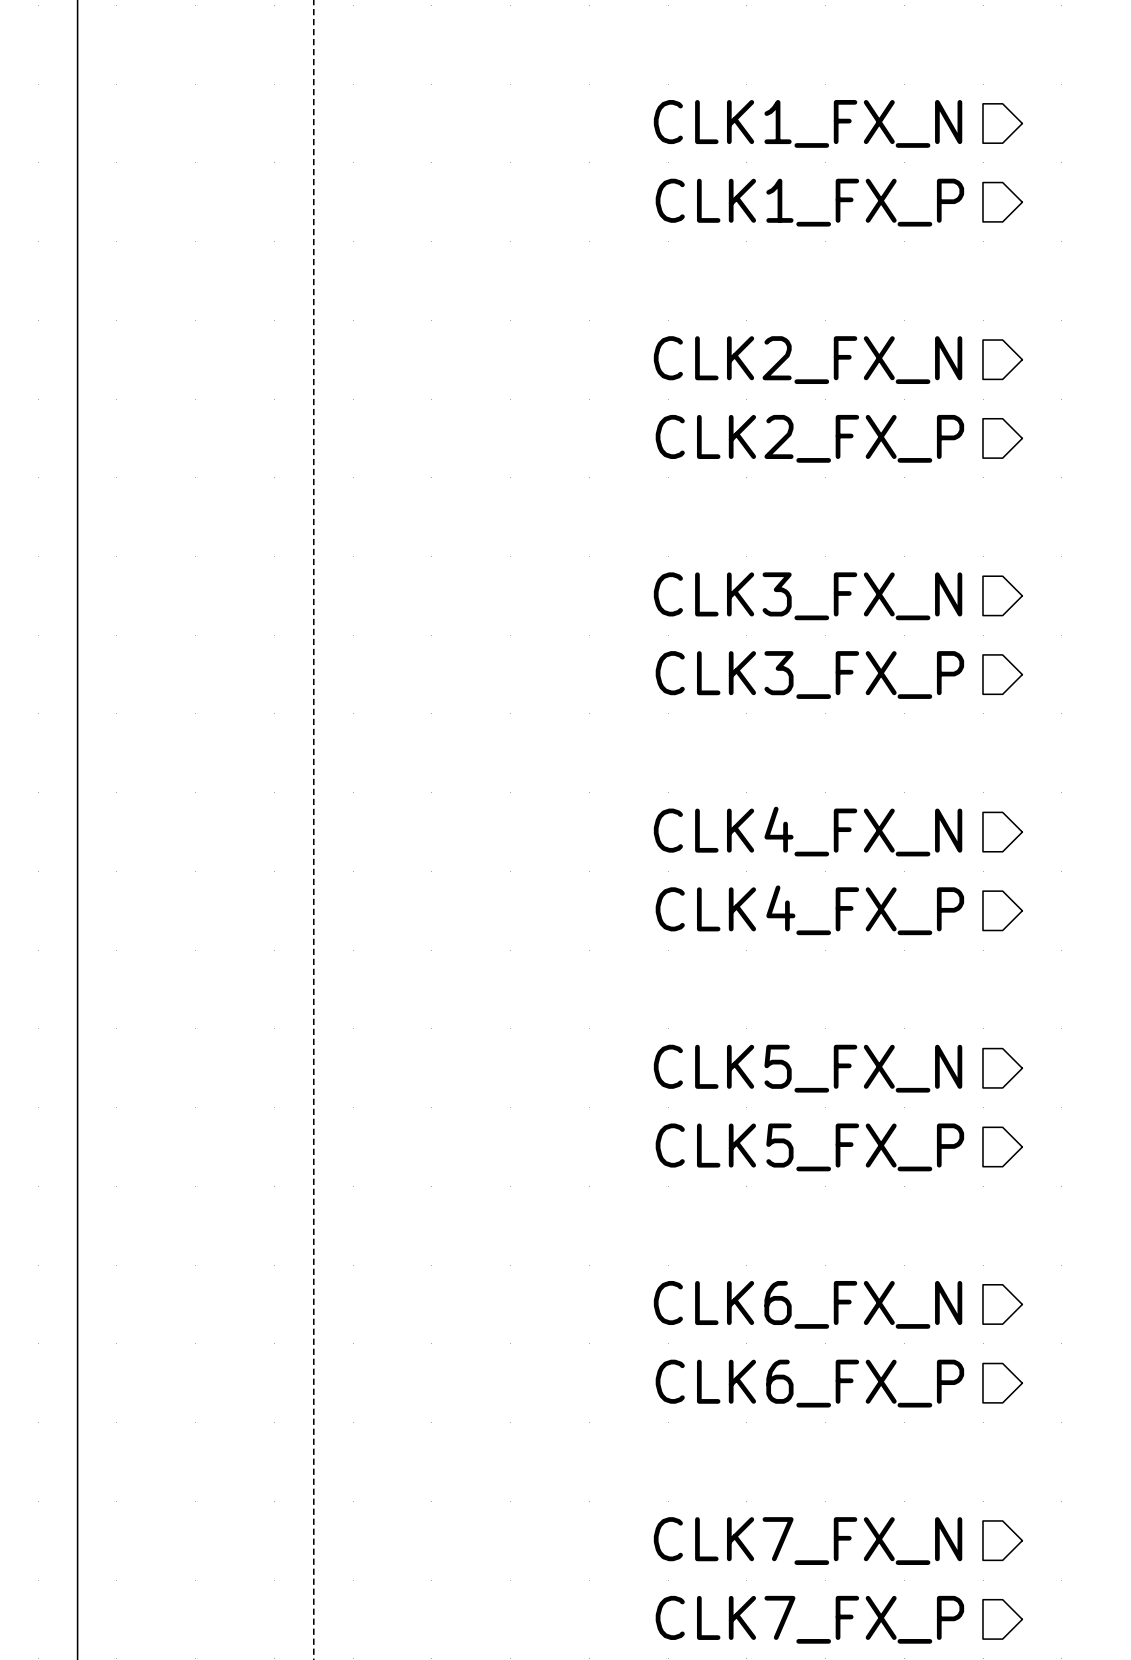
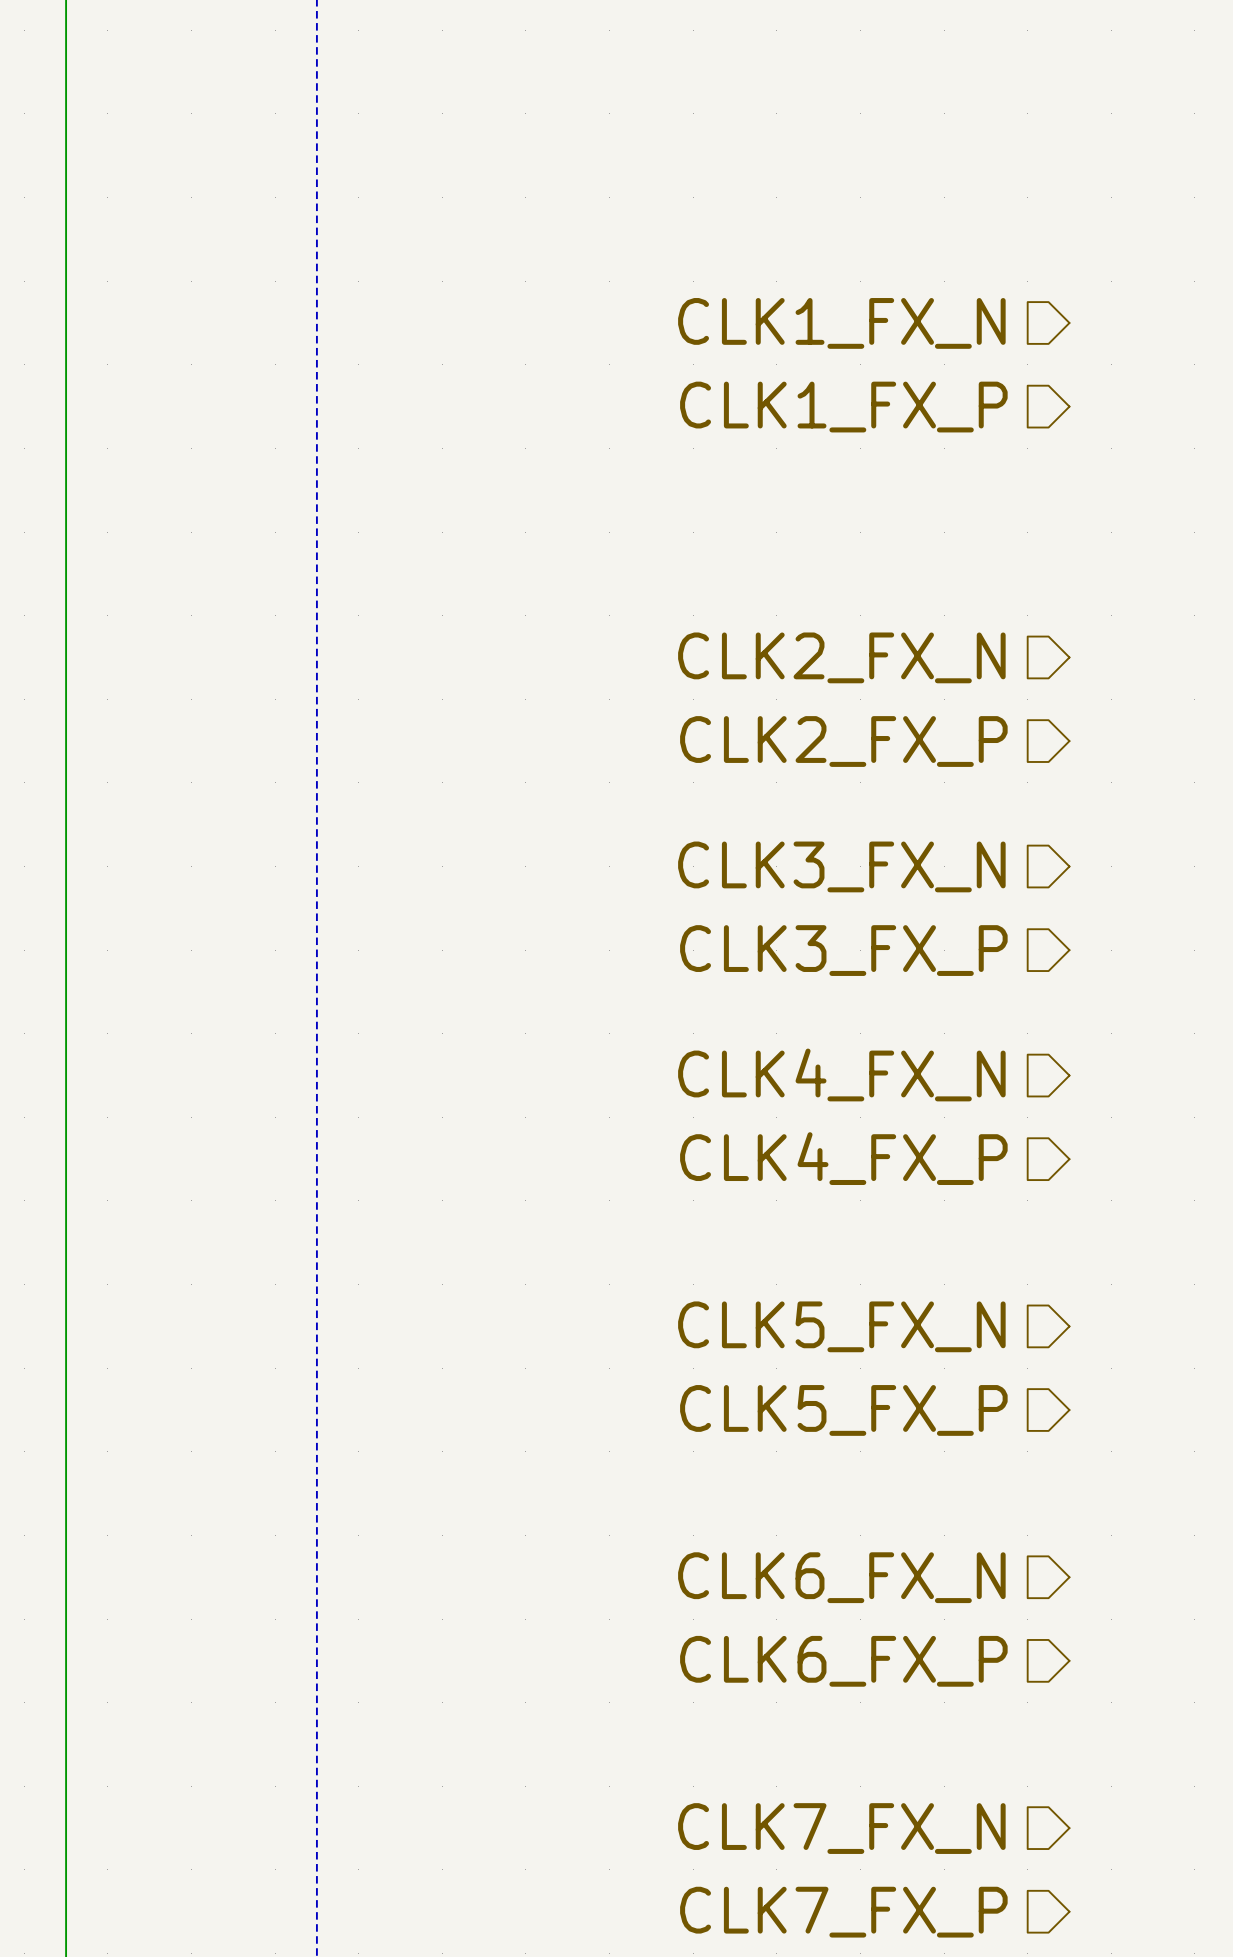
hierarchical label: CLK2_FX_N (808, 360) -> none
hierarchical label: CLK2_FX_P (809, 438) -> CLK2_FX_N (841, 657)
hierarchical label: none -> CLK2_FX_P (843, 741)
hierarchical label position: CLK3_FX_N (808, 596) -> CLK3_FX_N (841, 866)
hierarchical label position: CLK3_FX_P (809, 675) -> CLK3_FX_P (843, 950)

